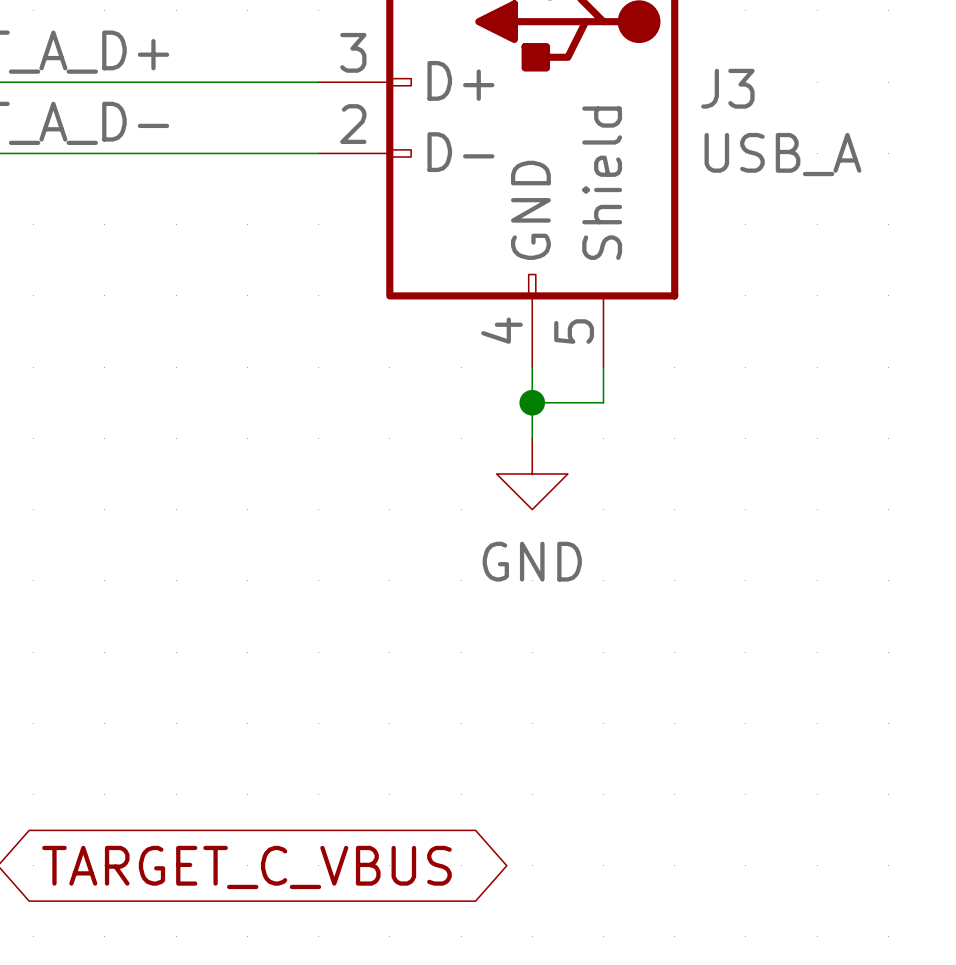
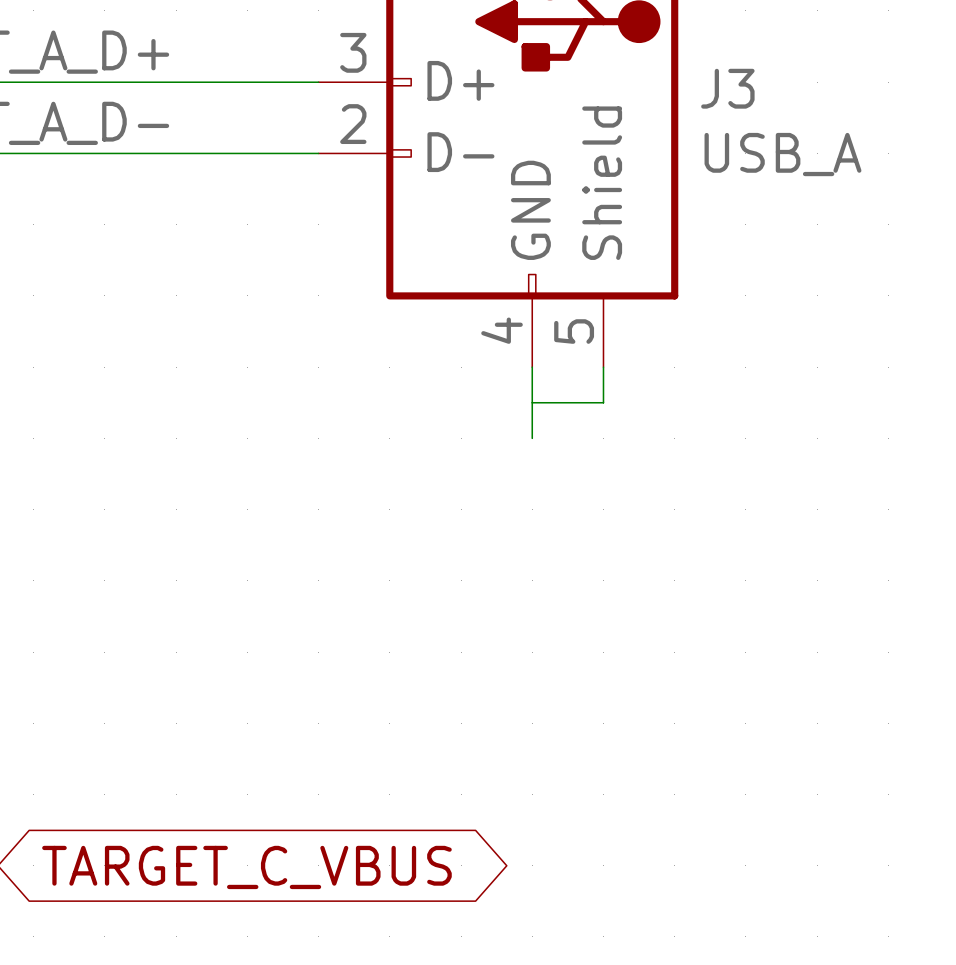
junction: (532, 402) -> none
power symbol: GND (532, 473) -> none

